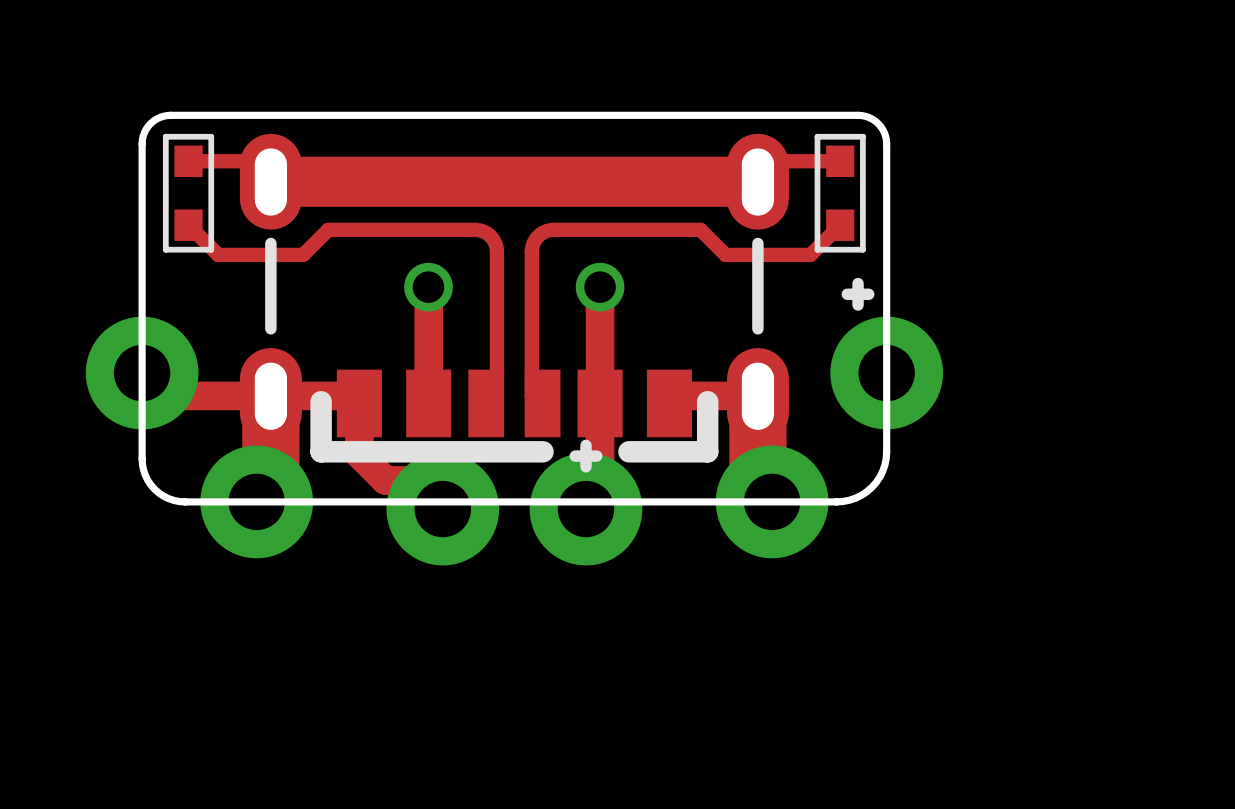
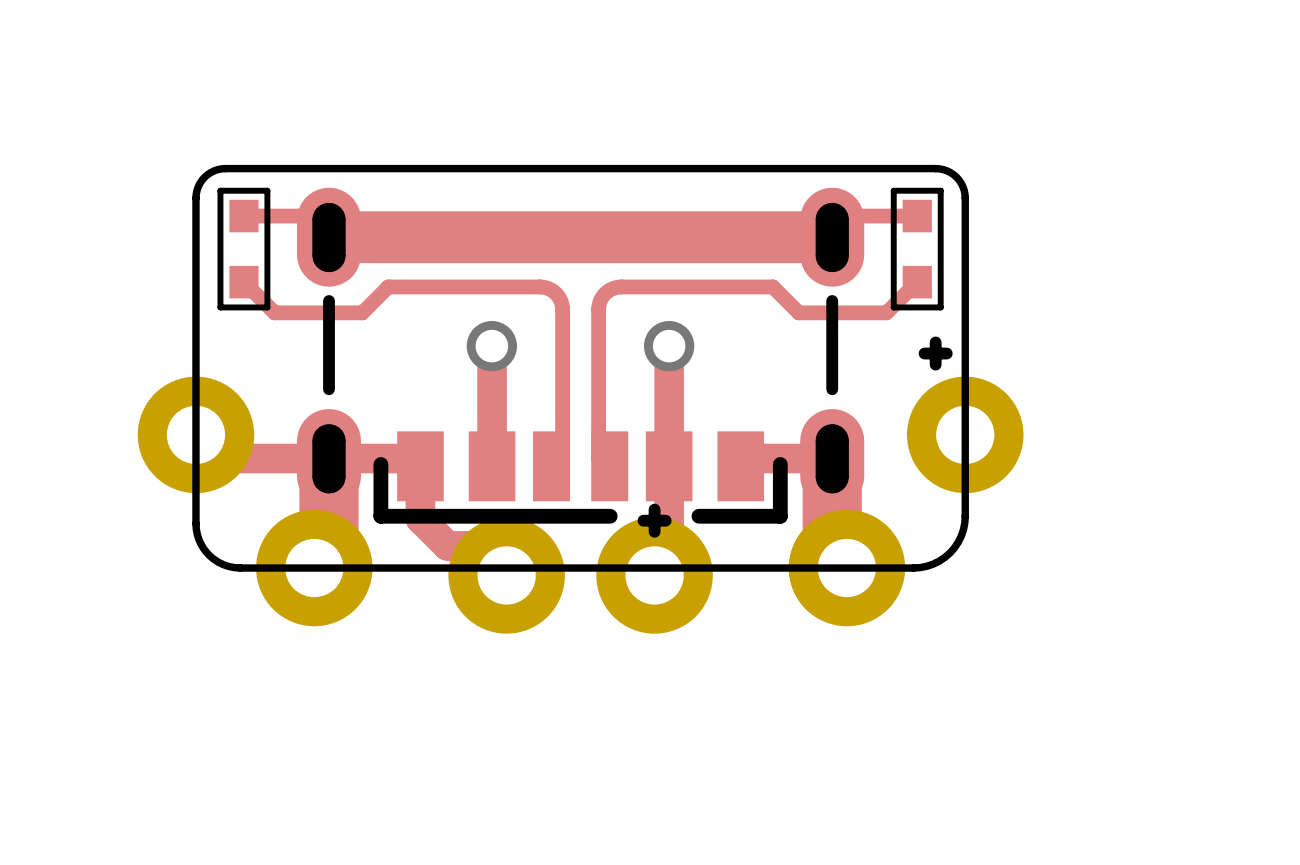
line width: thick (321, 401) (321, 451) (543, 451) -> thin (380, 464) (380, 516) (610, 516)
line width: thick (707, 401) (707, 451) (628, 451) -> thin (780, 464) (780, 516) (698, 516)

